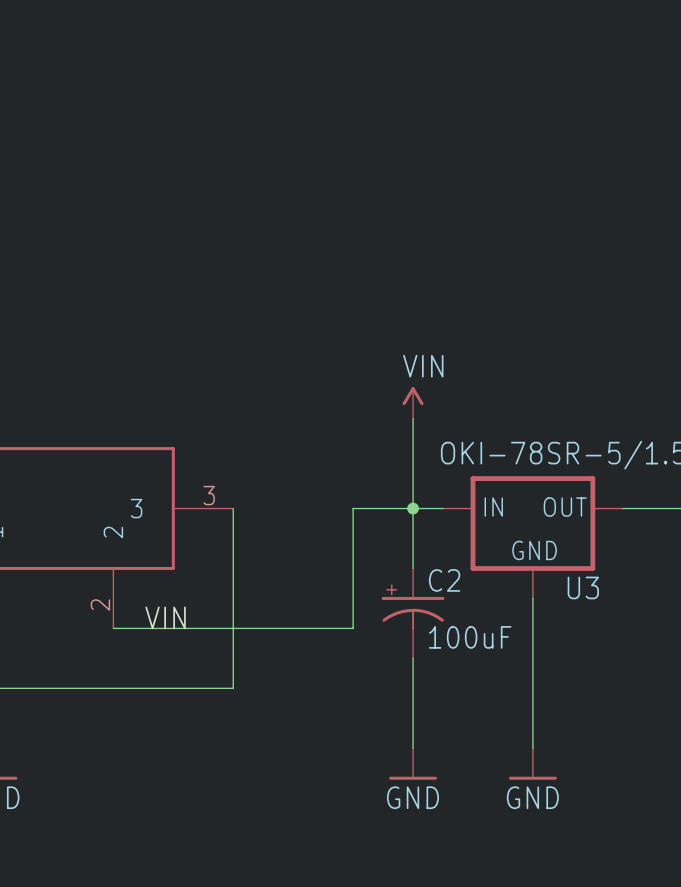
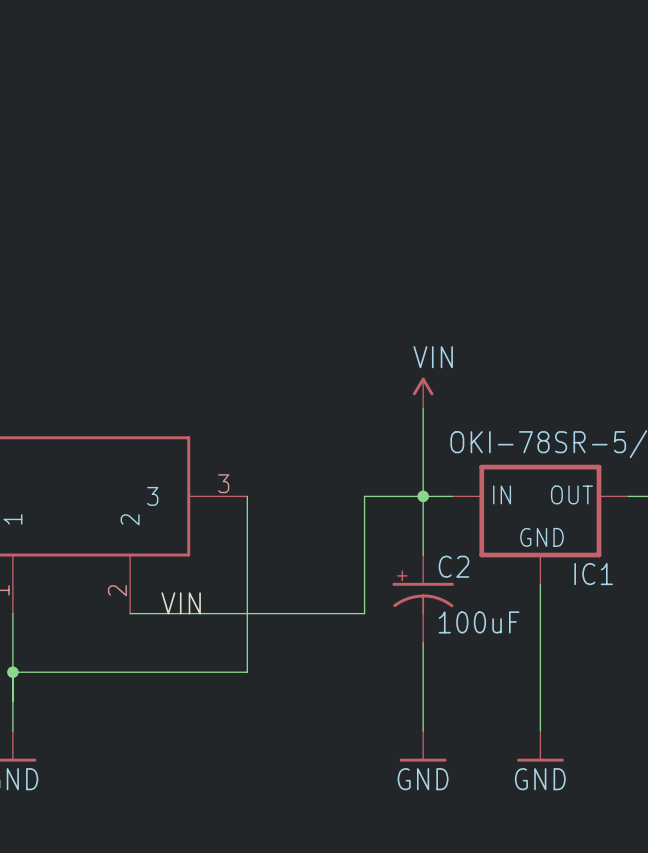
U3 name: U3 (583, 587) -> IC1 (593, 574)

